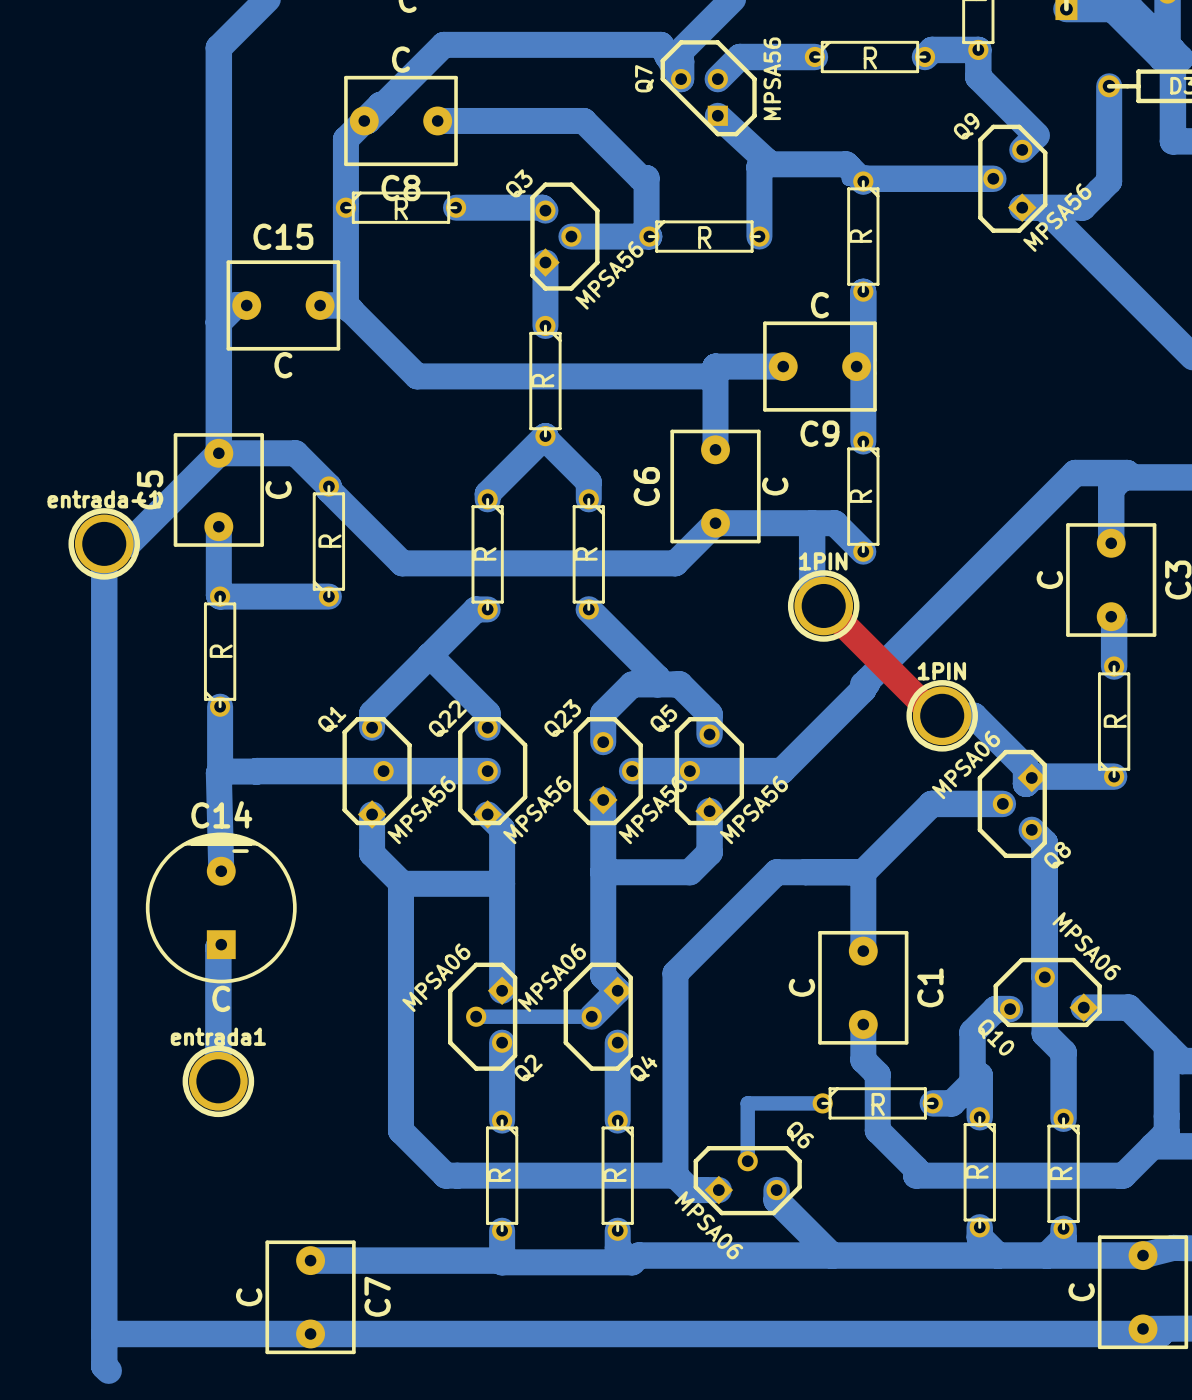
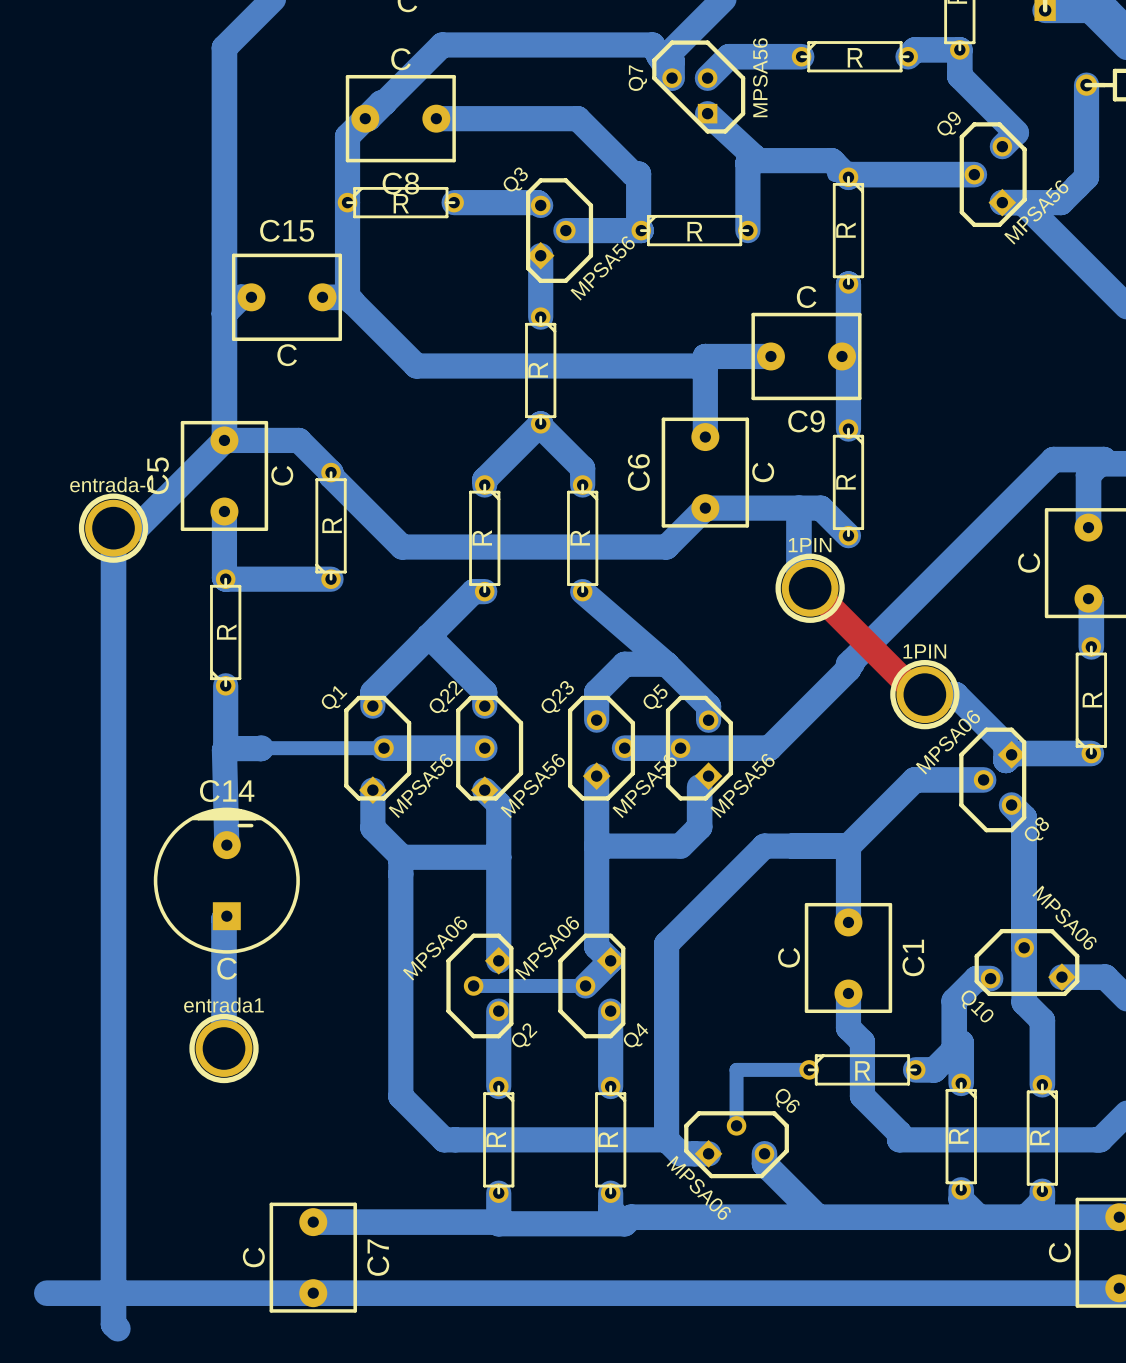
bottom track: (588, 609) (657, 678) (657, 684) -> (582, 591) (666, 664) (708, 706) (708, 720)
bottom track: (675, 684) (679, 684) (709, 714) (709, 734) -> none
Q5 footprint: [674, 717, 745, 826] -> [665, 695, 733, 801]
bottom track width: thick (256, 771) (383, 771) -> thin (261, 748) (383, 748)
bottom track: none -> (46, 1293) (113, 1293)

